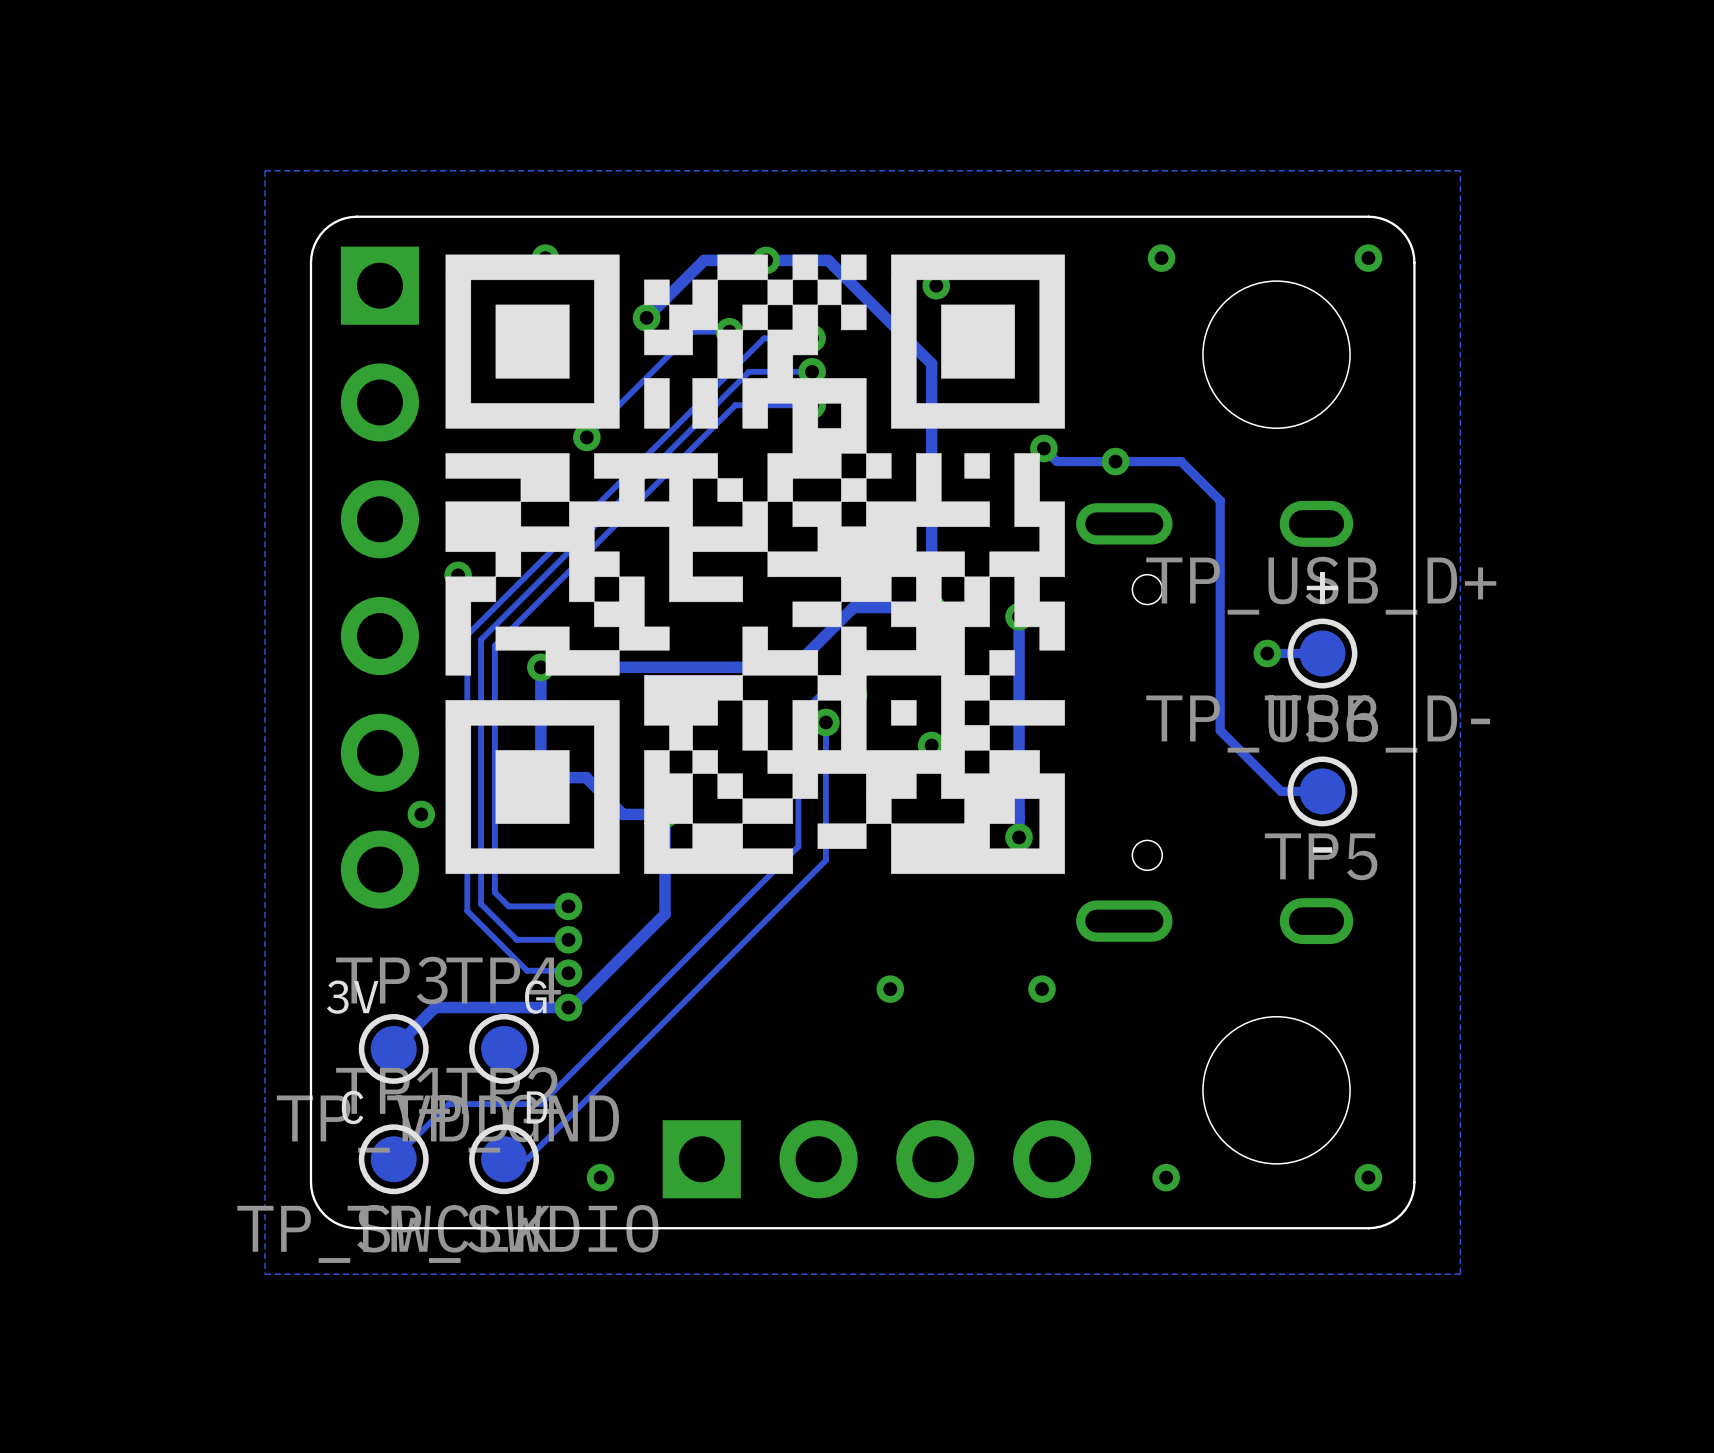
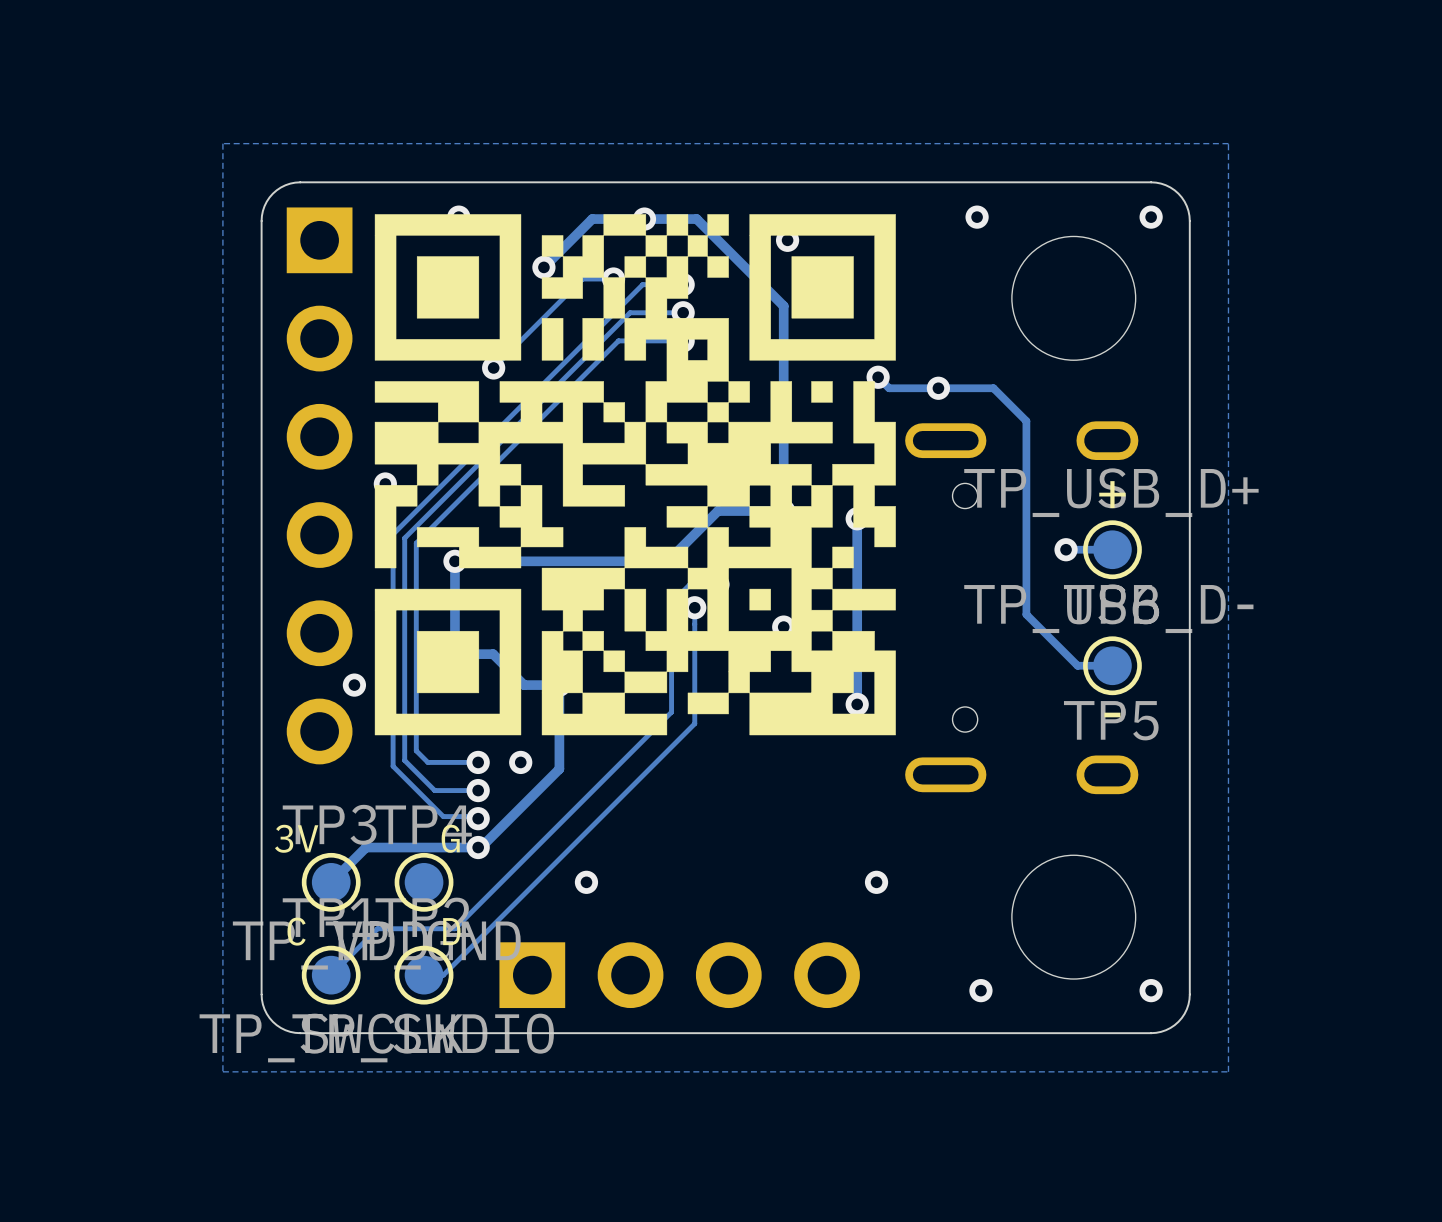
via: none -> (520, 762)
via: (890, 989) -> none
via position: (1042, 989) -> (876, 882)
via: none -> (586, 882)
part position: (876, 1159) -> (679, 975)
via: (600, 1177) -> none

